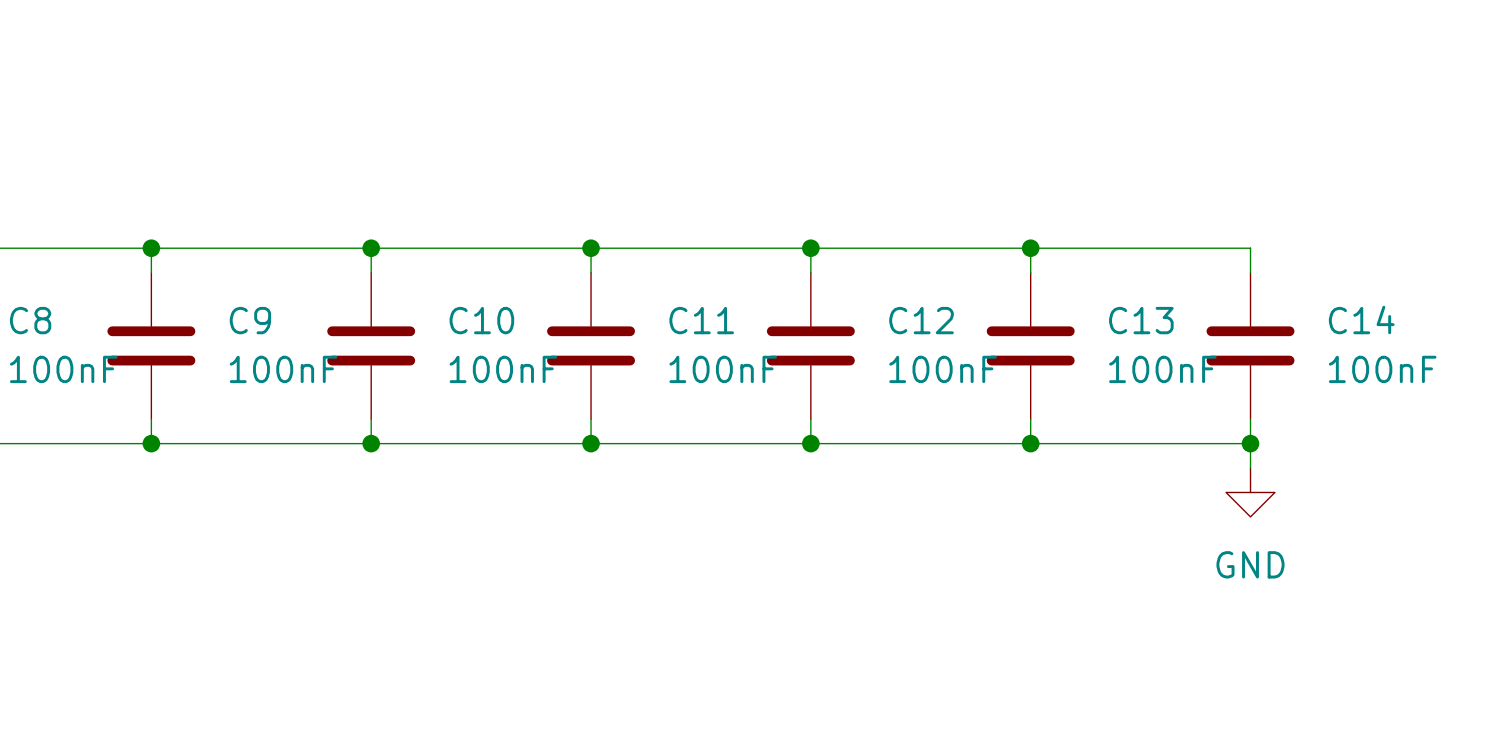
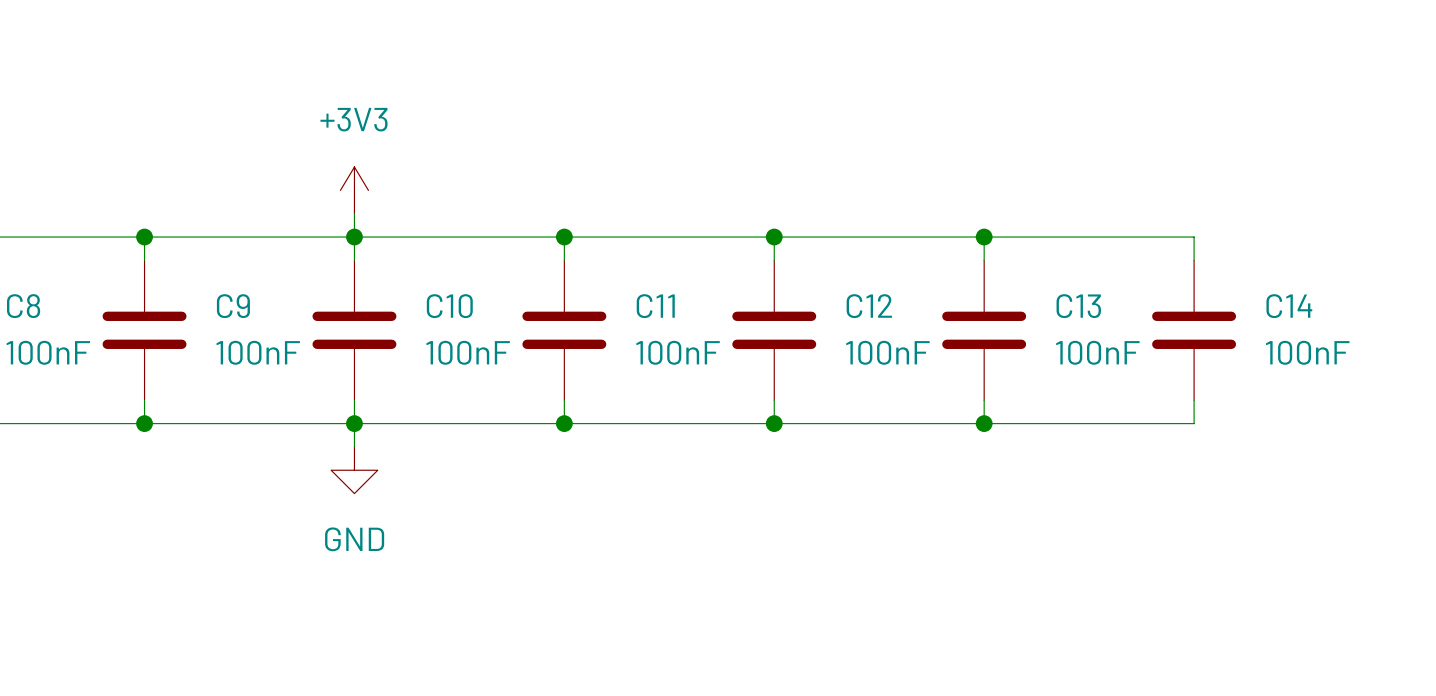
power symbol: none -> +3V3 (354, 190)
wire: none -> (354, 213) (354, 237)
wire: none -> (354, 423) (354, 446)
wire: (1250, 443) (1250, 468) -> none
junction: (1250, 443) -> none
power symbol: none -> GND (354, 470)
power symbol: GND (1250, 492) -> none

